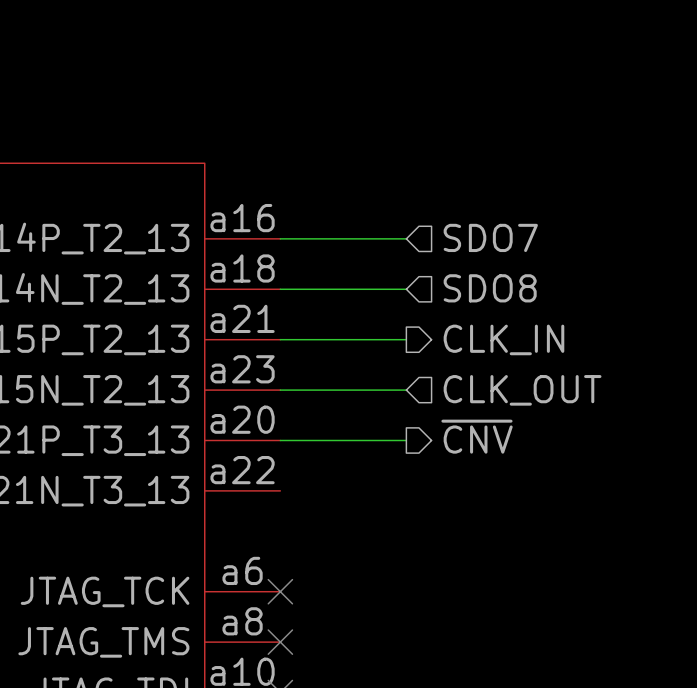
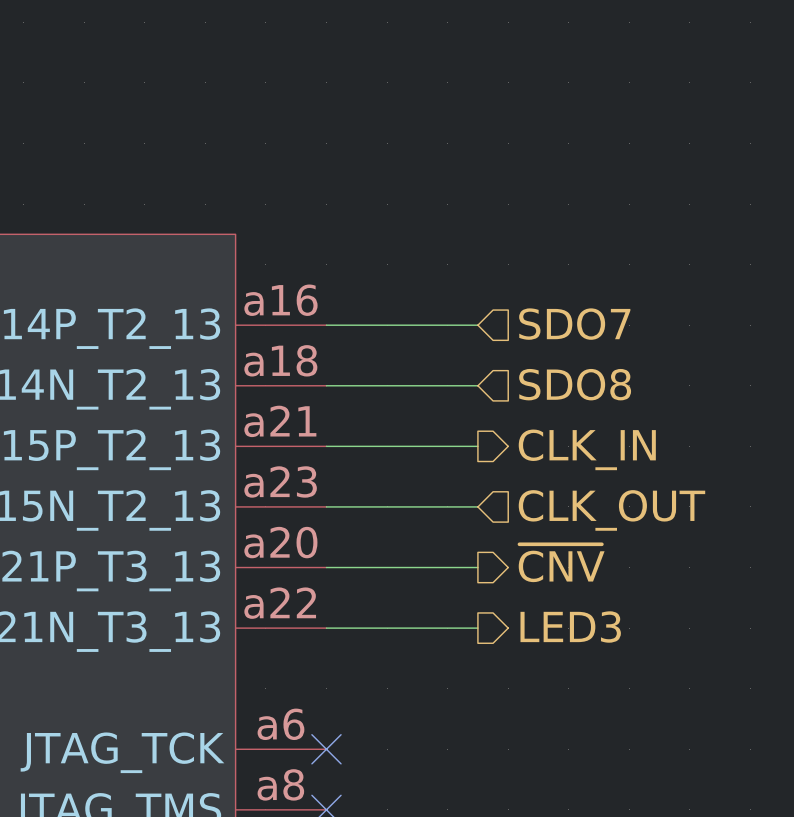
hierarchical label: none -> LED3 (570, 627)
wire: none -> (326, 628) (477, 628)

